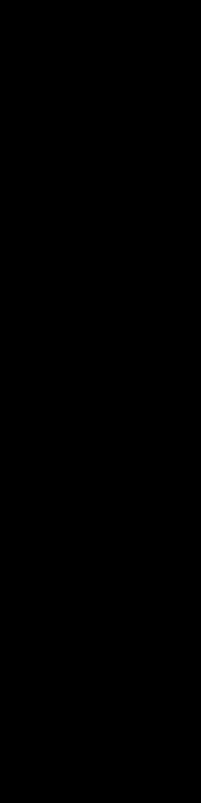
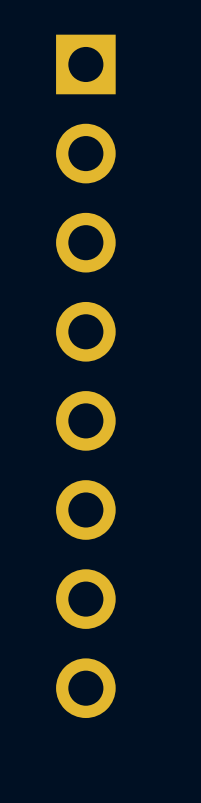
part: none -> (85, 376)

